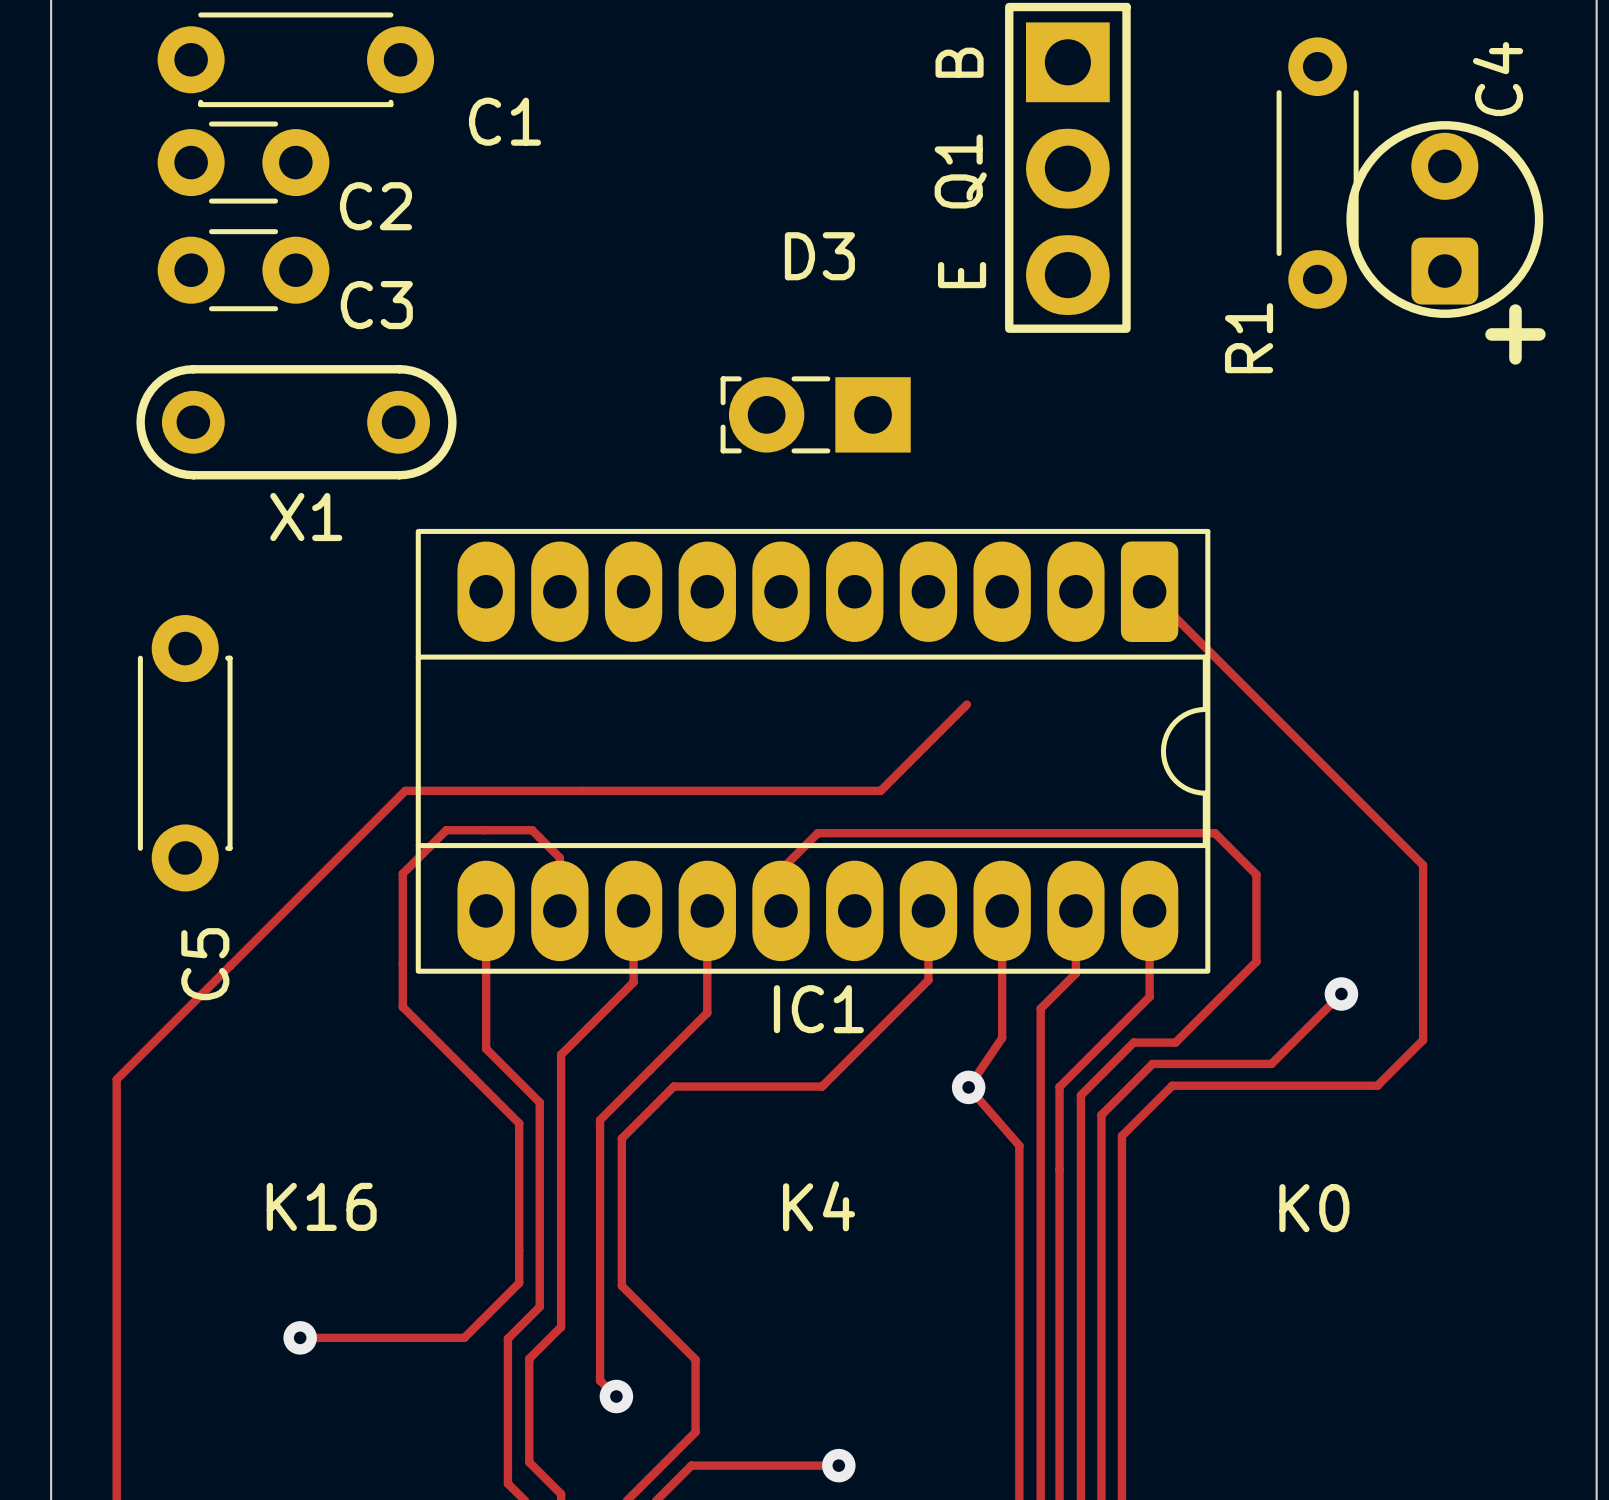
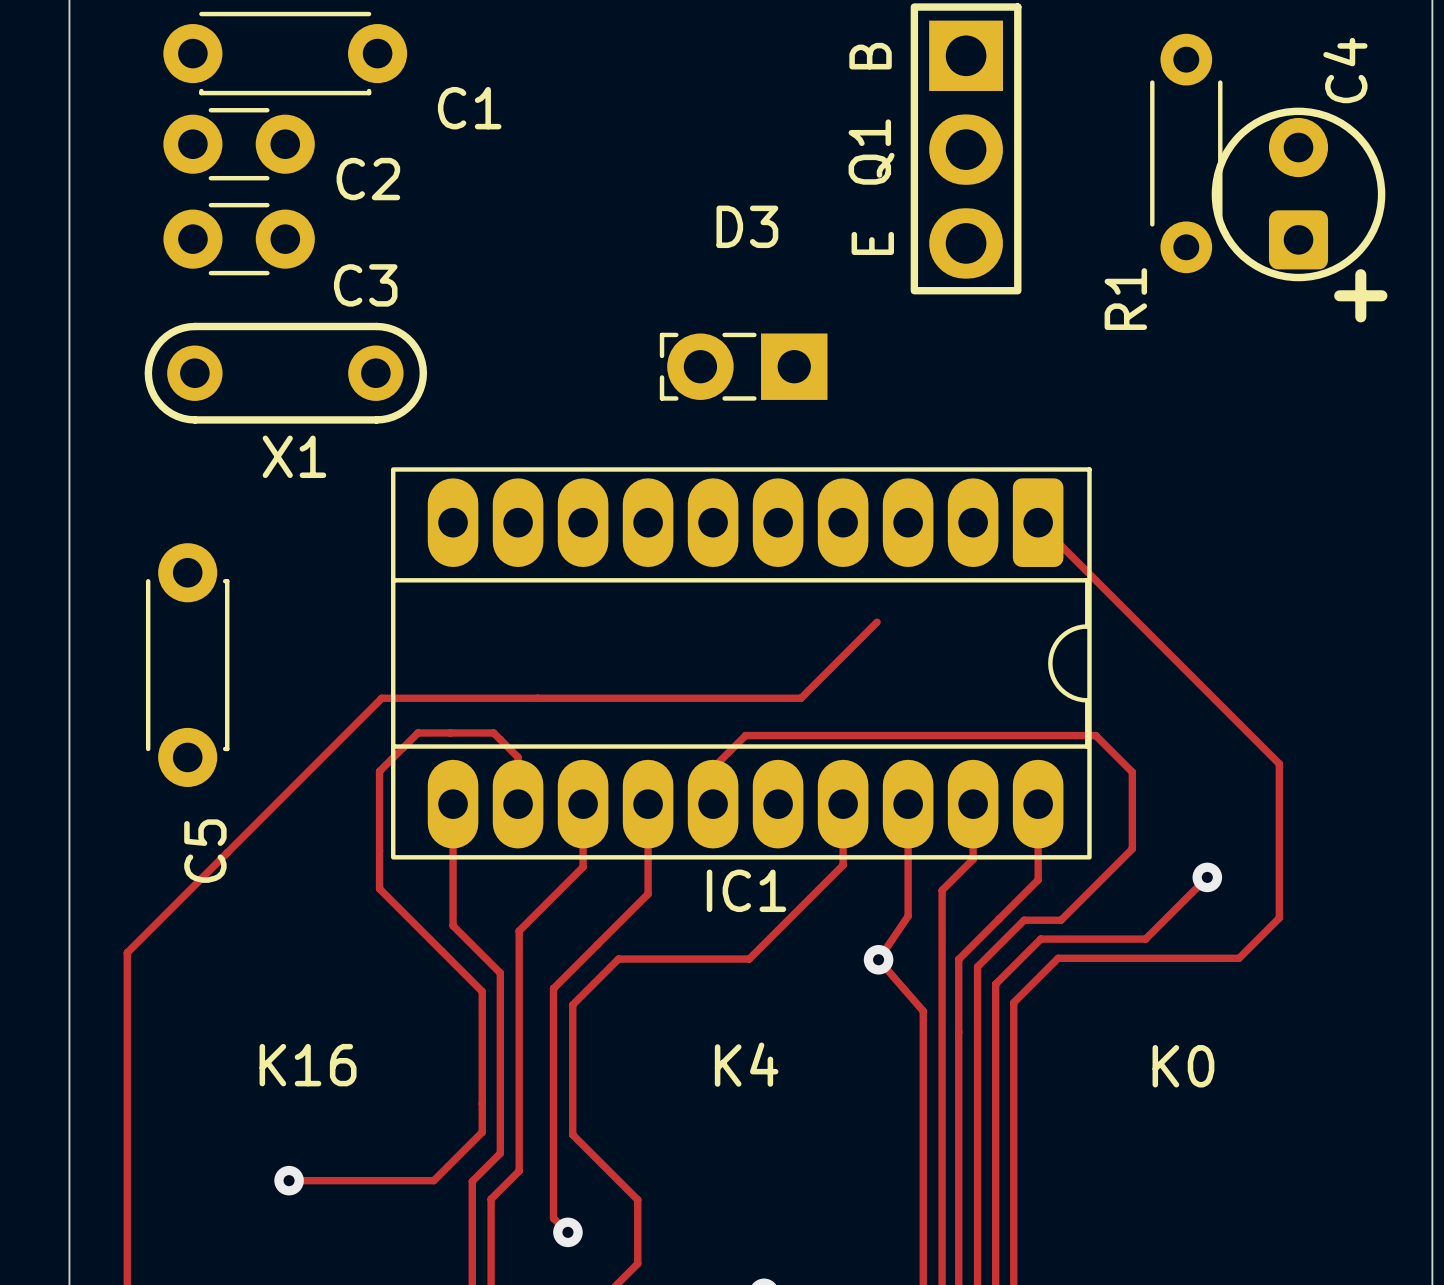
C2 name position: C2 (375, 206) -> C2 (368, 179)
C3 name position: C3 (376, 305) -> C3 (365, 285)

